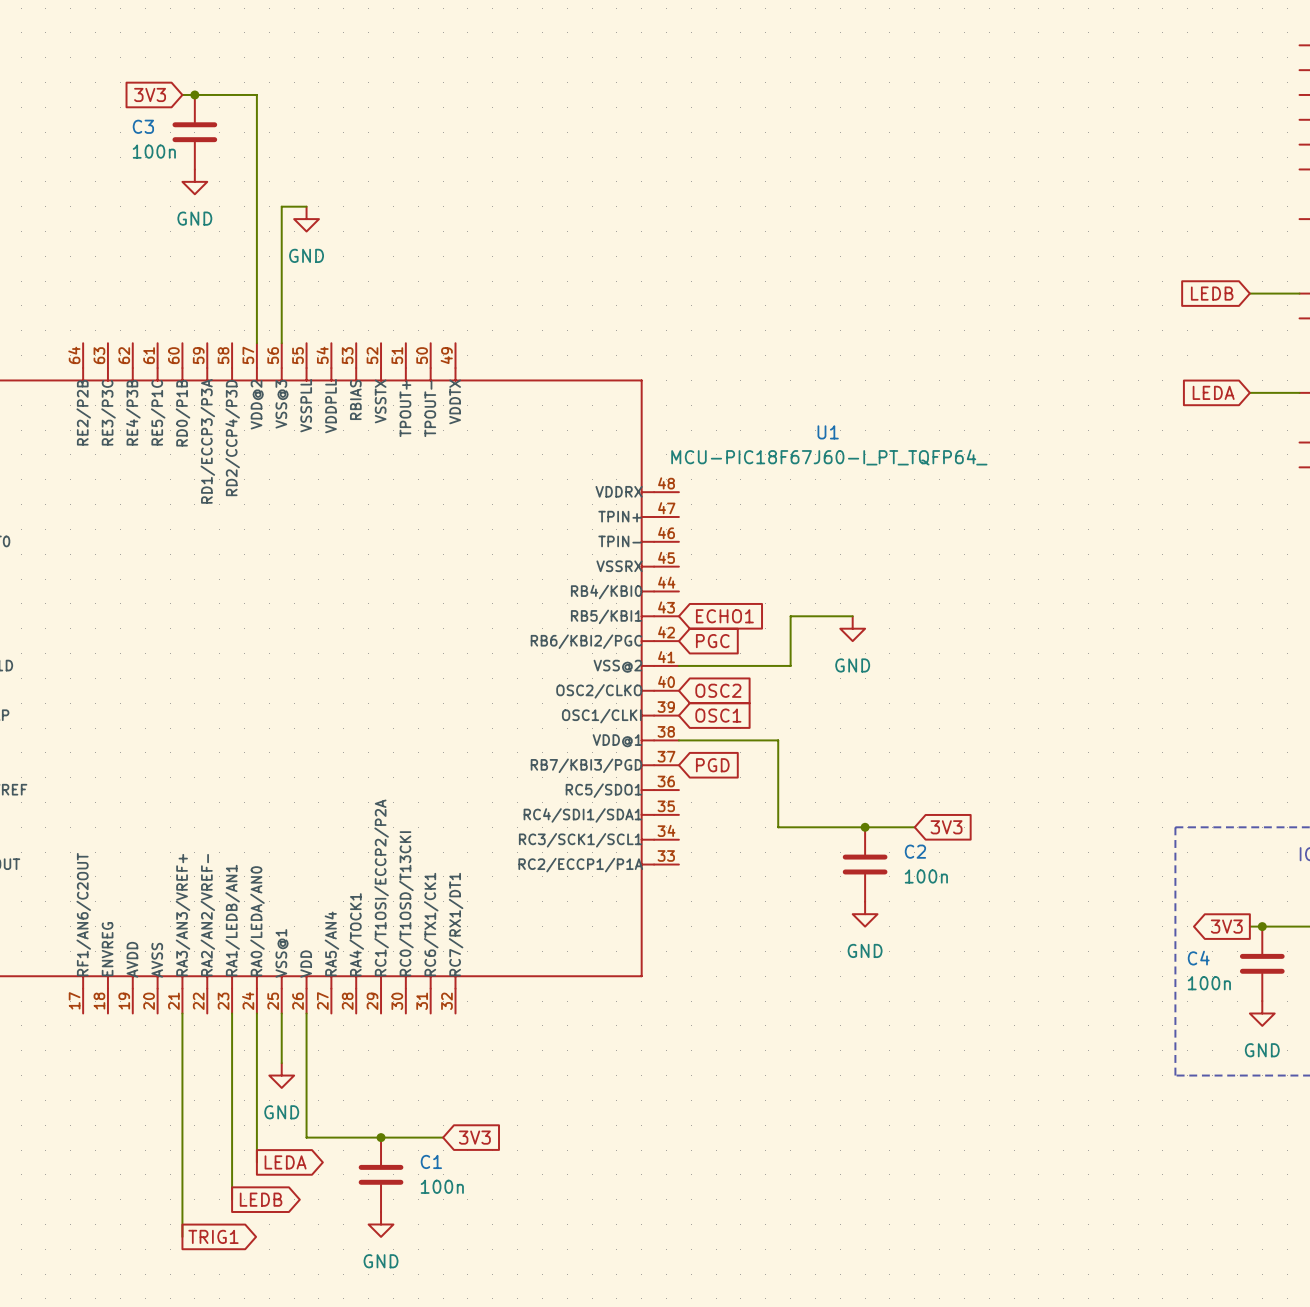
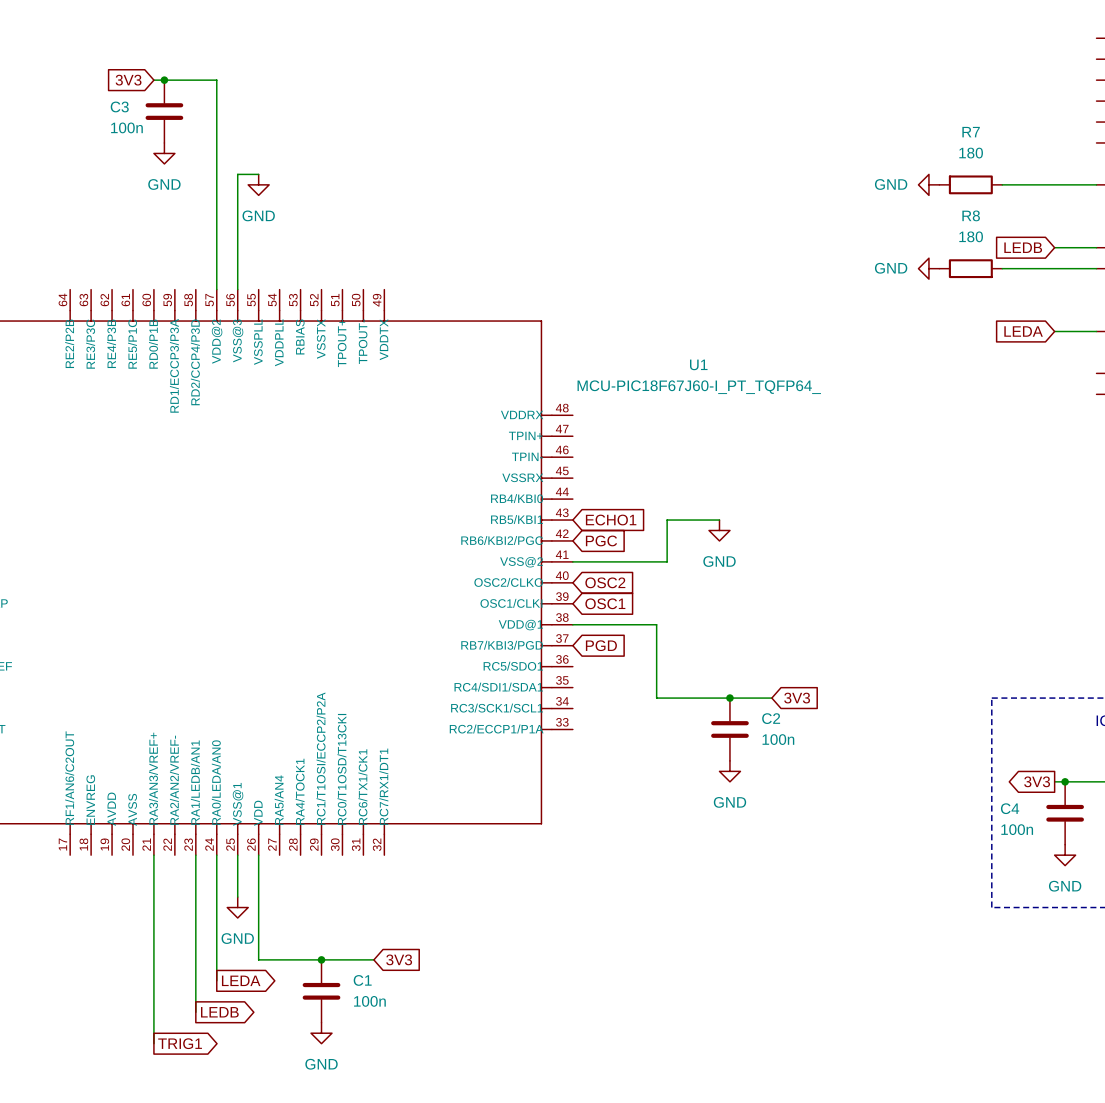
power symbol: none -> GND (928, 184)
R7: none -> 180 (970, 184)
wire: none -> (1002, 184) (1096, 184)
power symbol: none -> GND (928, 268)
R8: none -> 180 (970, 268)
wire: none -> (1002, 268) (1096, 268)

